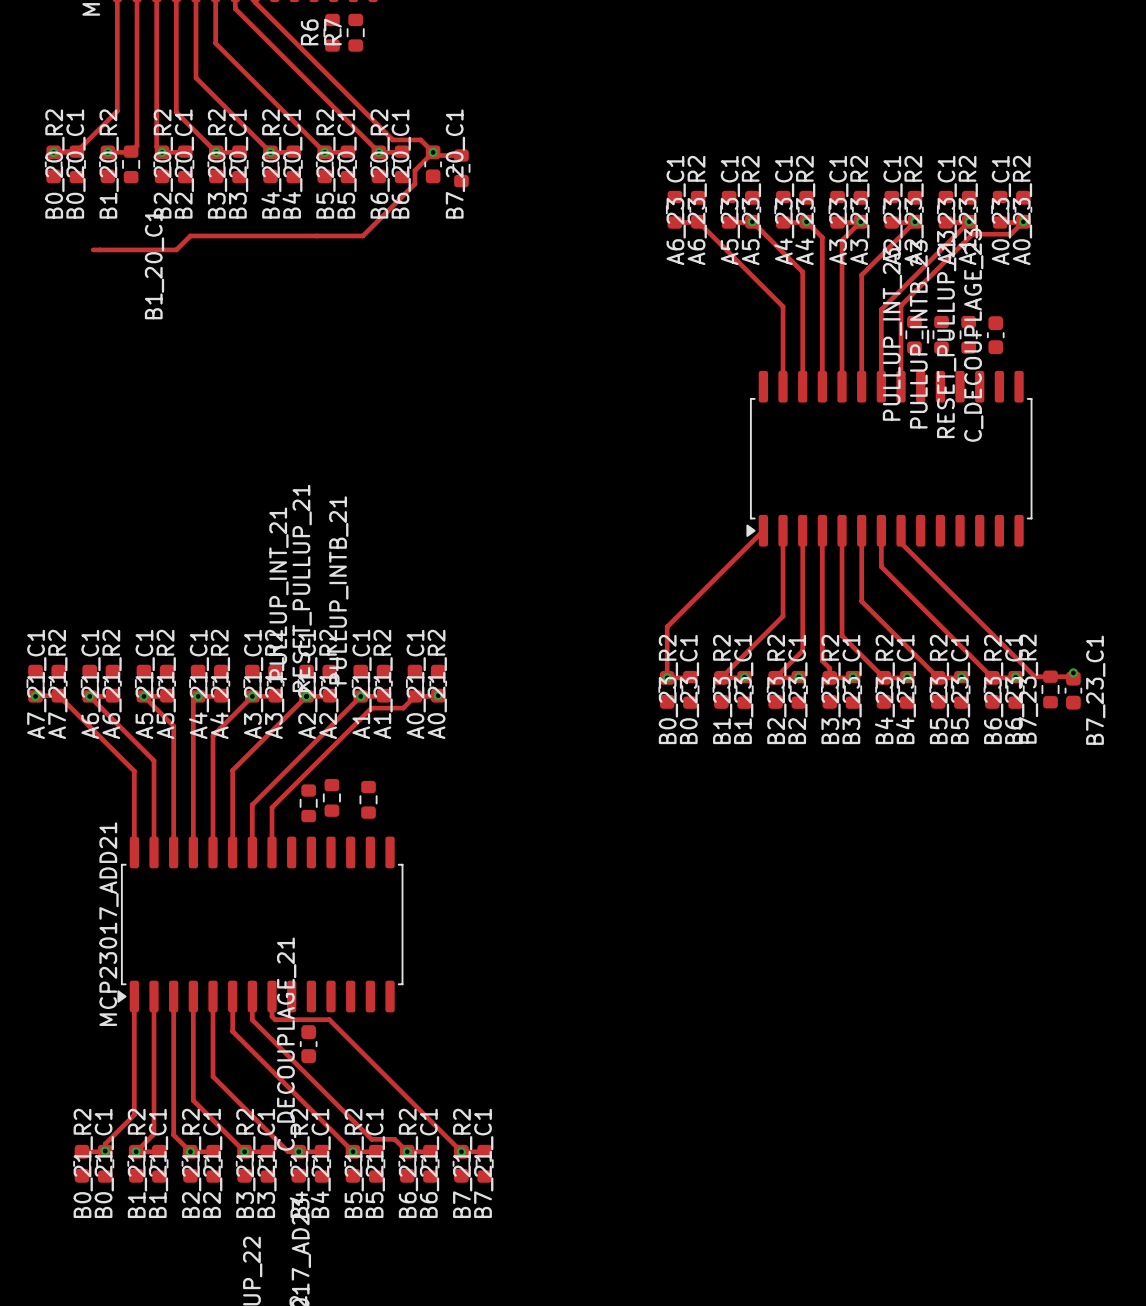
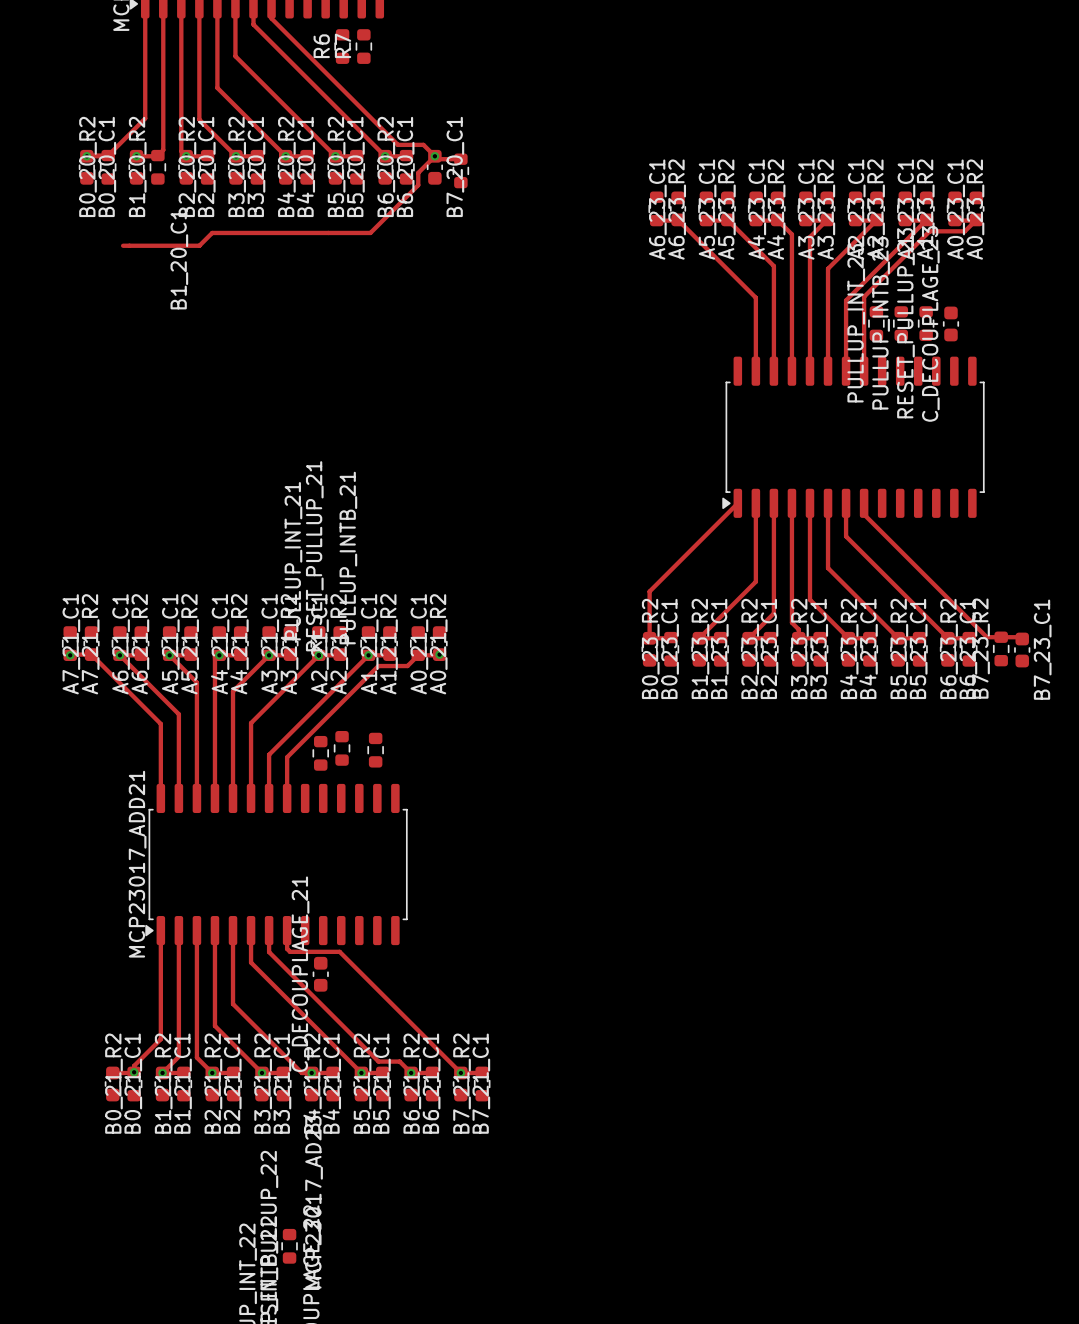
via: (752, 221) -> none
via: (806, 221) -> none
via: (860, 221) -> none
via: (914, 221) -> none
via: (969, 221) -> none
via: (1023, 221) -> none
via: (1073, 672) -> none
via: (667, 677) -> none
via: (744, 677) -> none
via: (798, 677) -> none
via: (853, 677) -> none
via: (907, 677) -> none
via: (961, 677) -> none
via: (1015, 677) -> none

